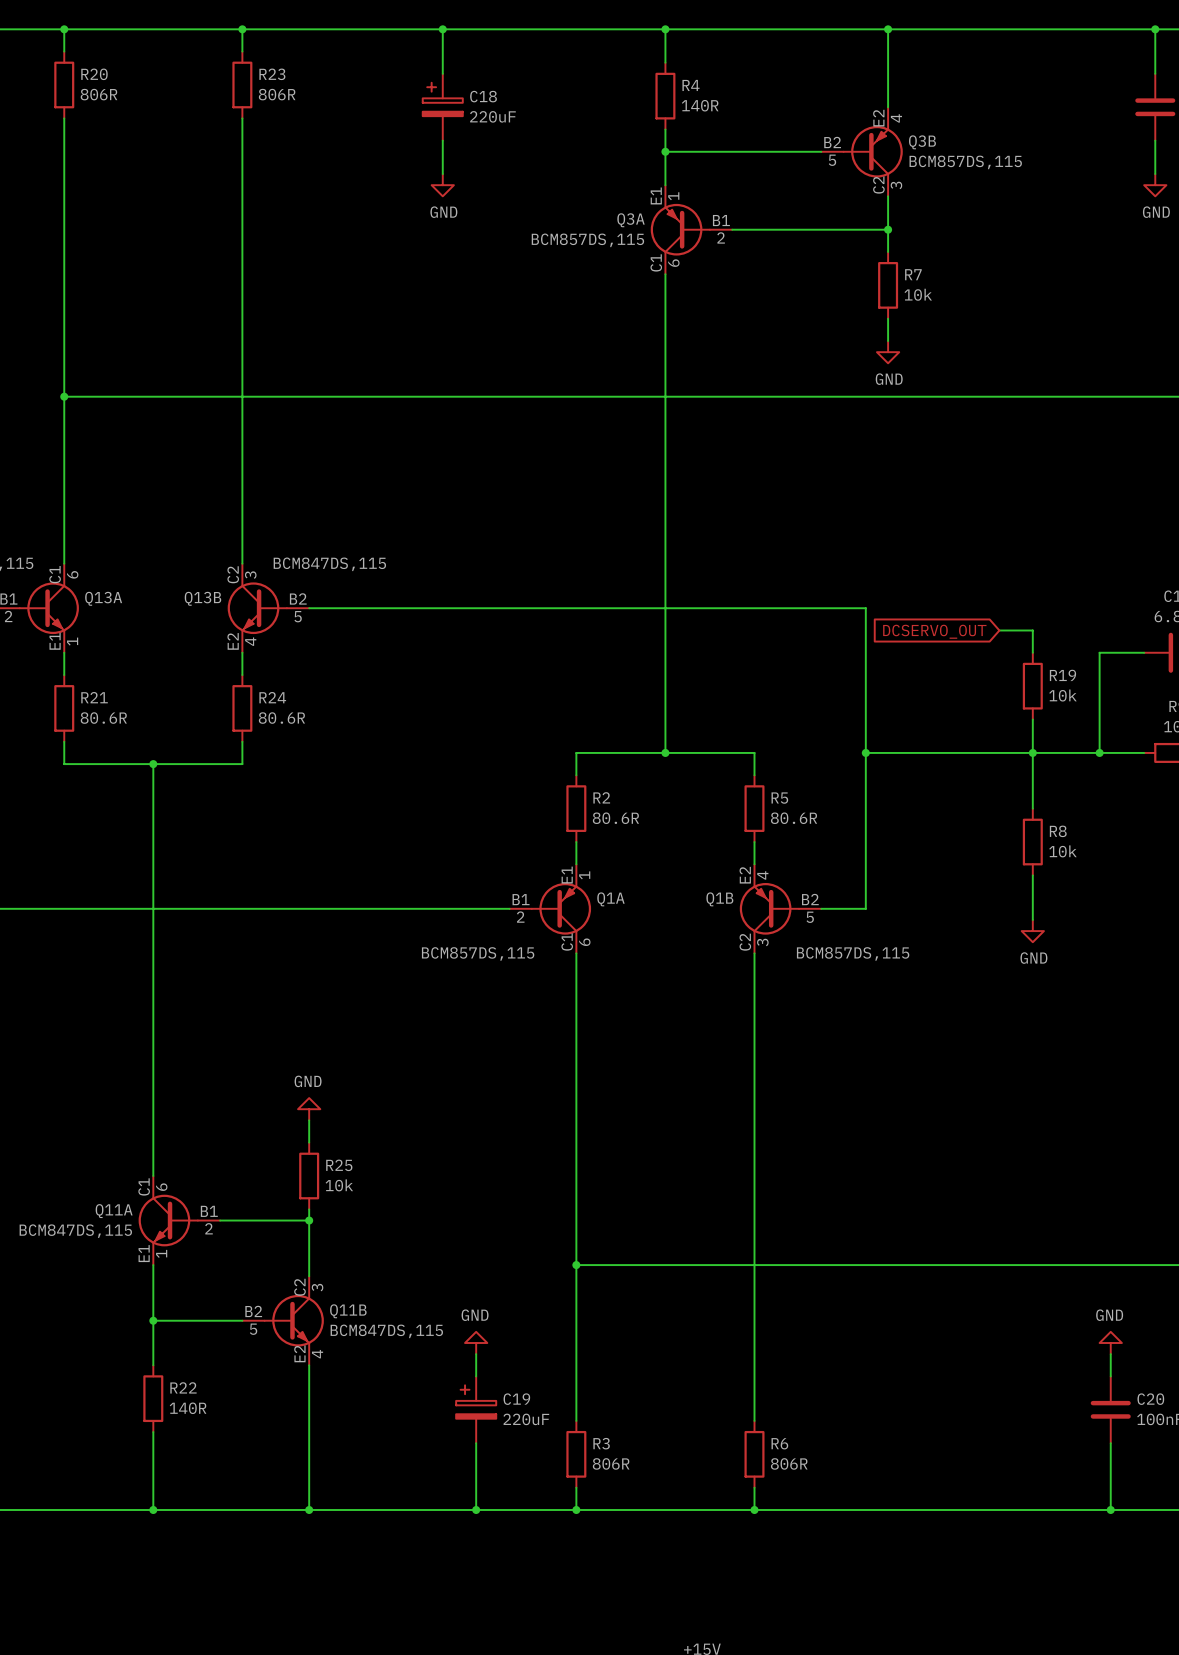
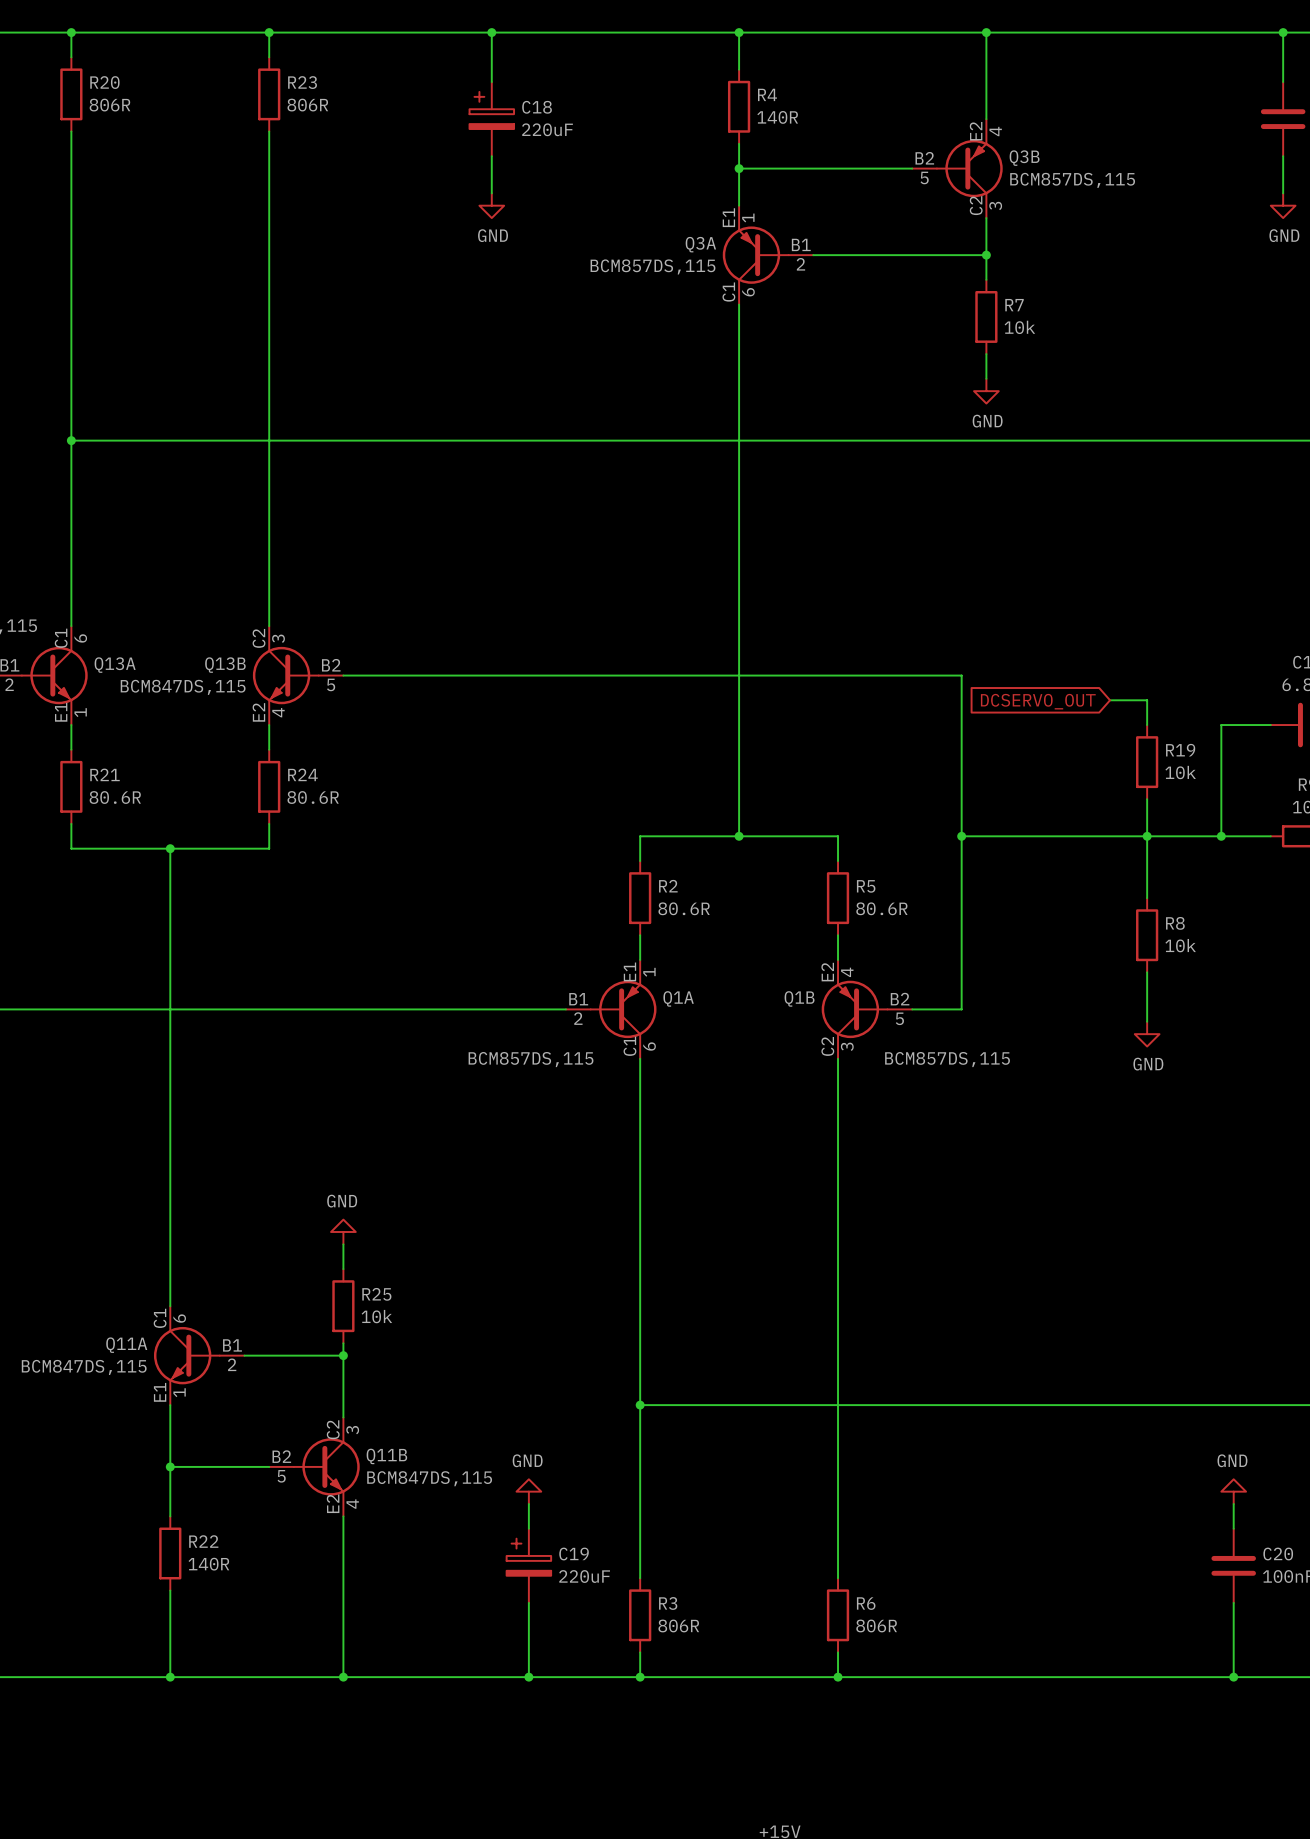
Q13B value position: BCM847DS,115 (329, 564) -> BCM847DS,115 (183, 687)

